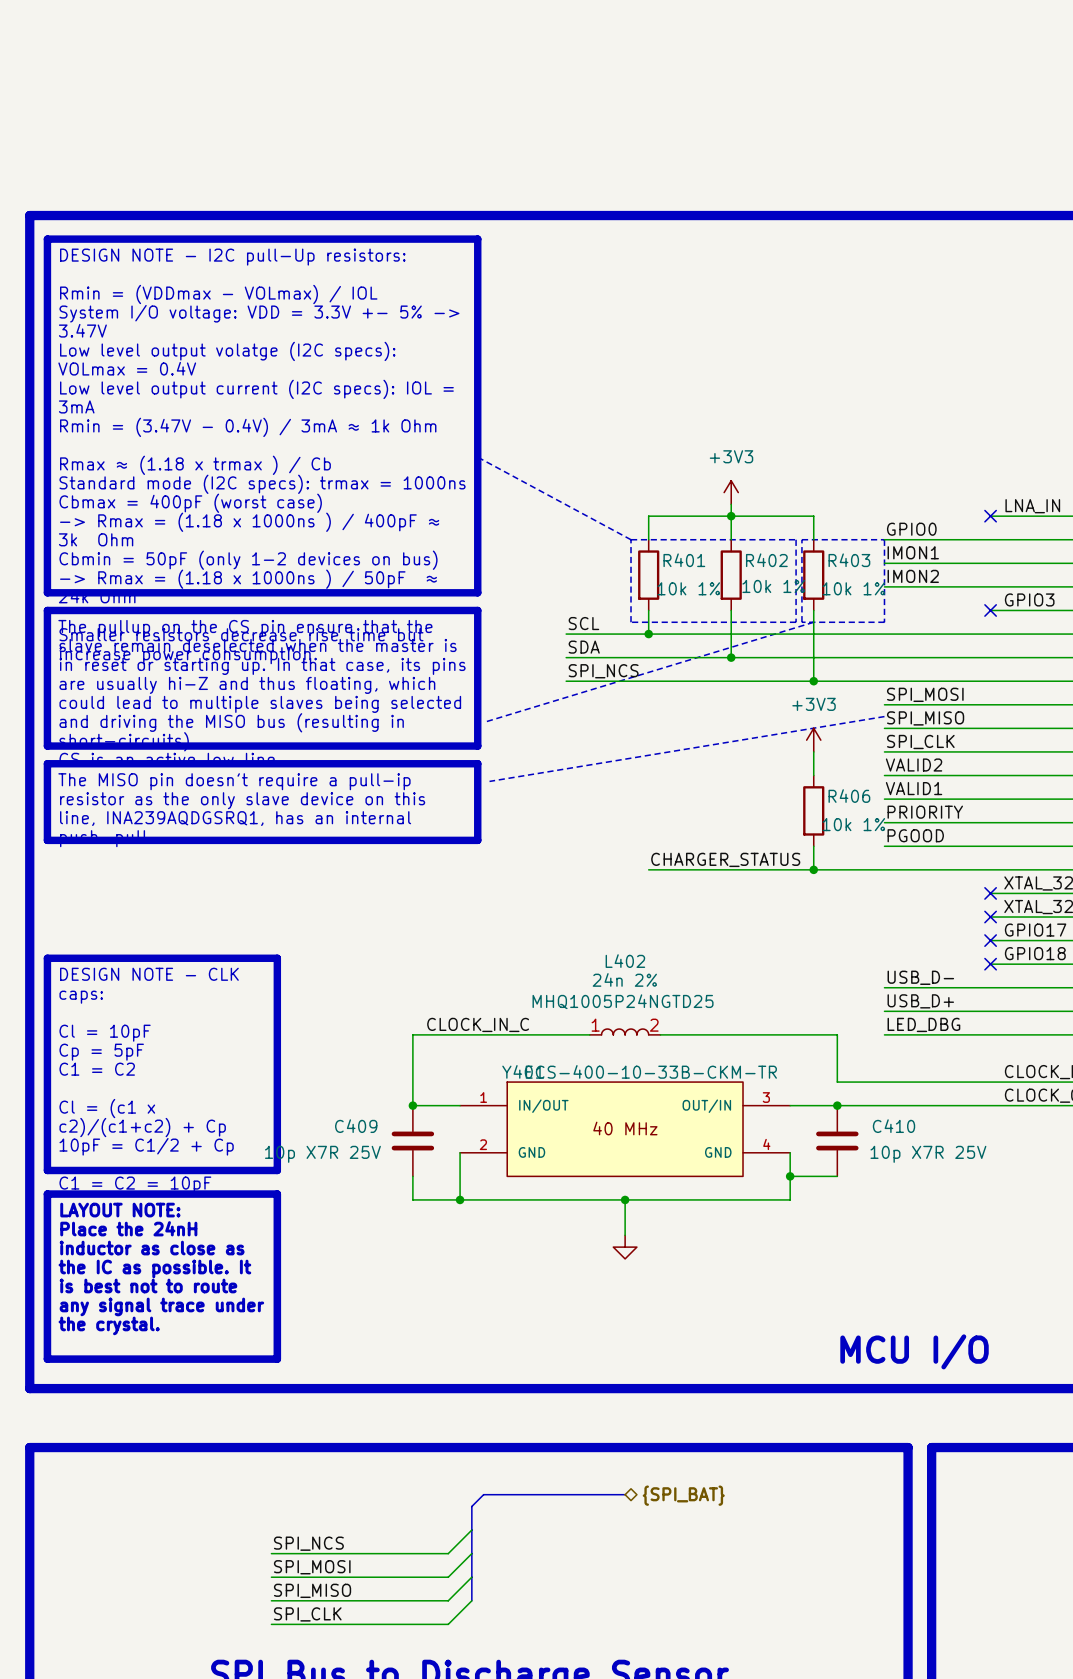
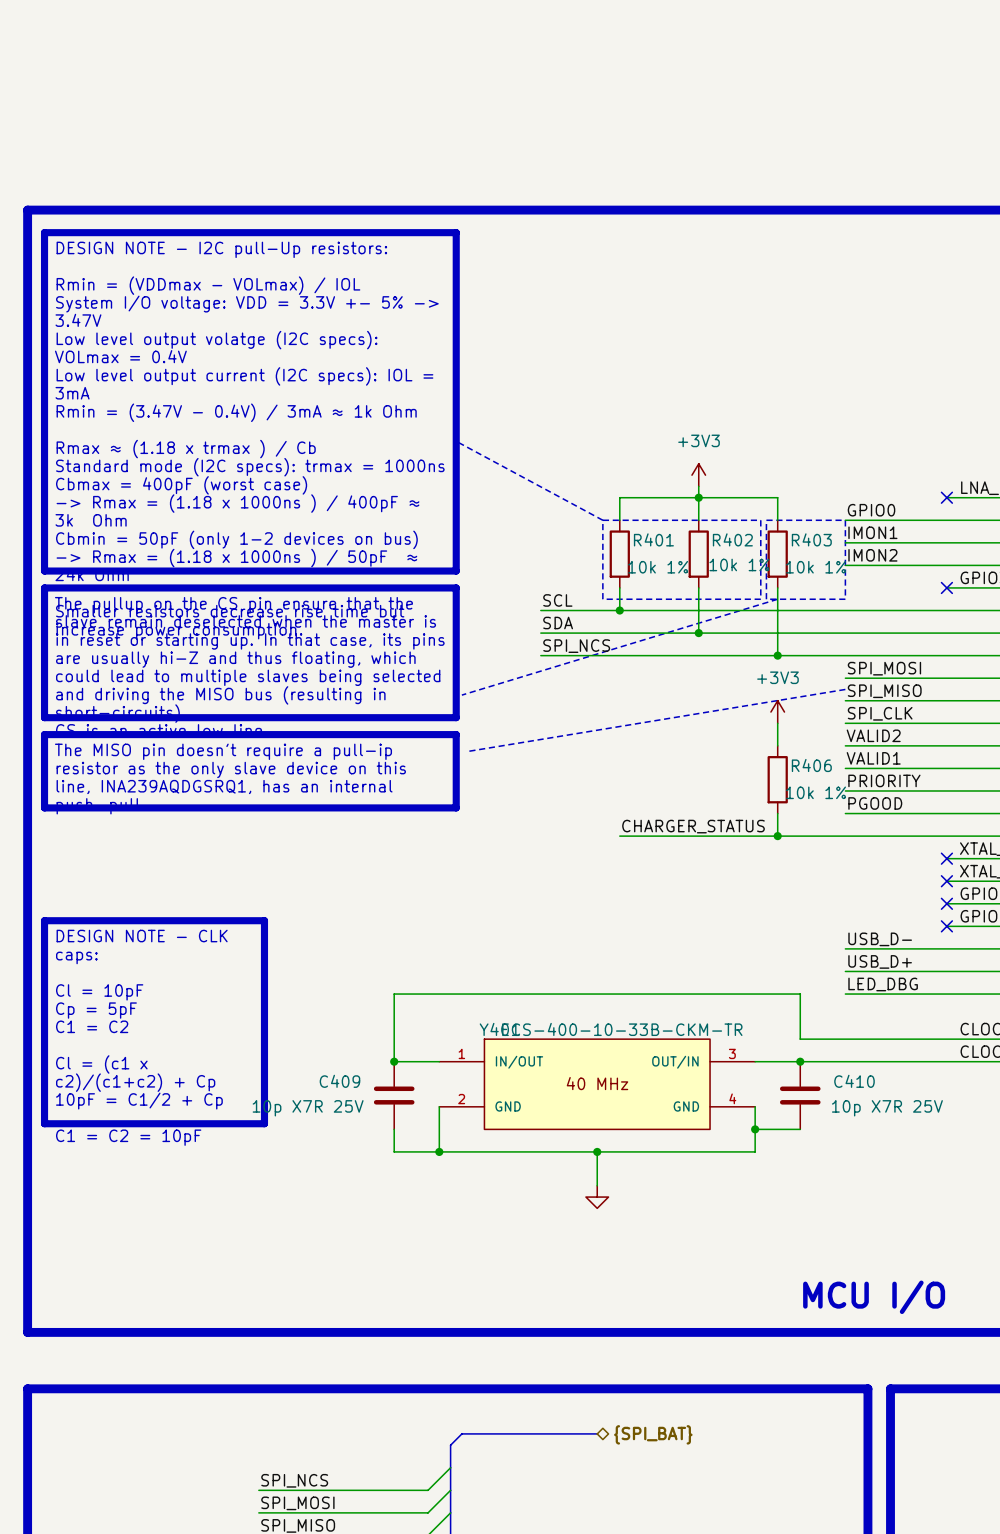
label: CLOCK_IN_C (478, 1024) -> none
L402: 24n 2% (625, 1031) -> none
wire: none -> (563, 994) (631, 994)
line: (47, 1194) (277, 1194) (277, 1359) (47, 1359) (47, 1194) -> none
text: LAYOUT NOTE: (120, 1210) -> none
text: Place the 24nH (128, 1228) -> none
text: inductor as close as (152, 1248) -> none
text: the IC as possible. It (154, 1268) -> none
text: is best not to route (148, 1285) -> none
text: any signal trace under (161, 1306) -> none
text: the crystal. (109, 1325) -> none

